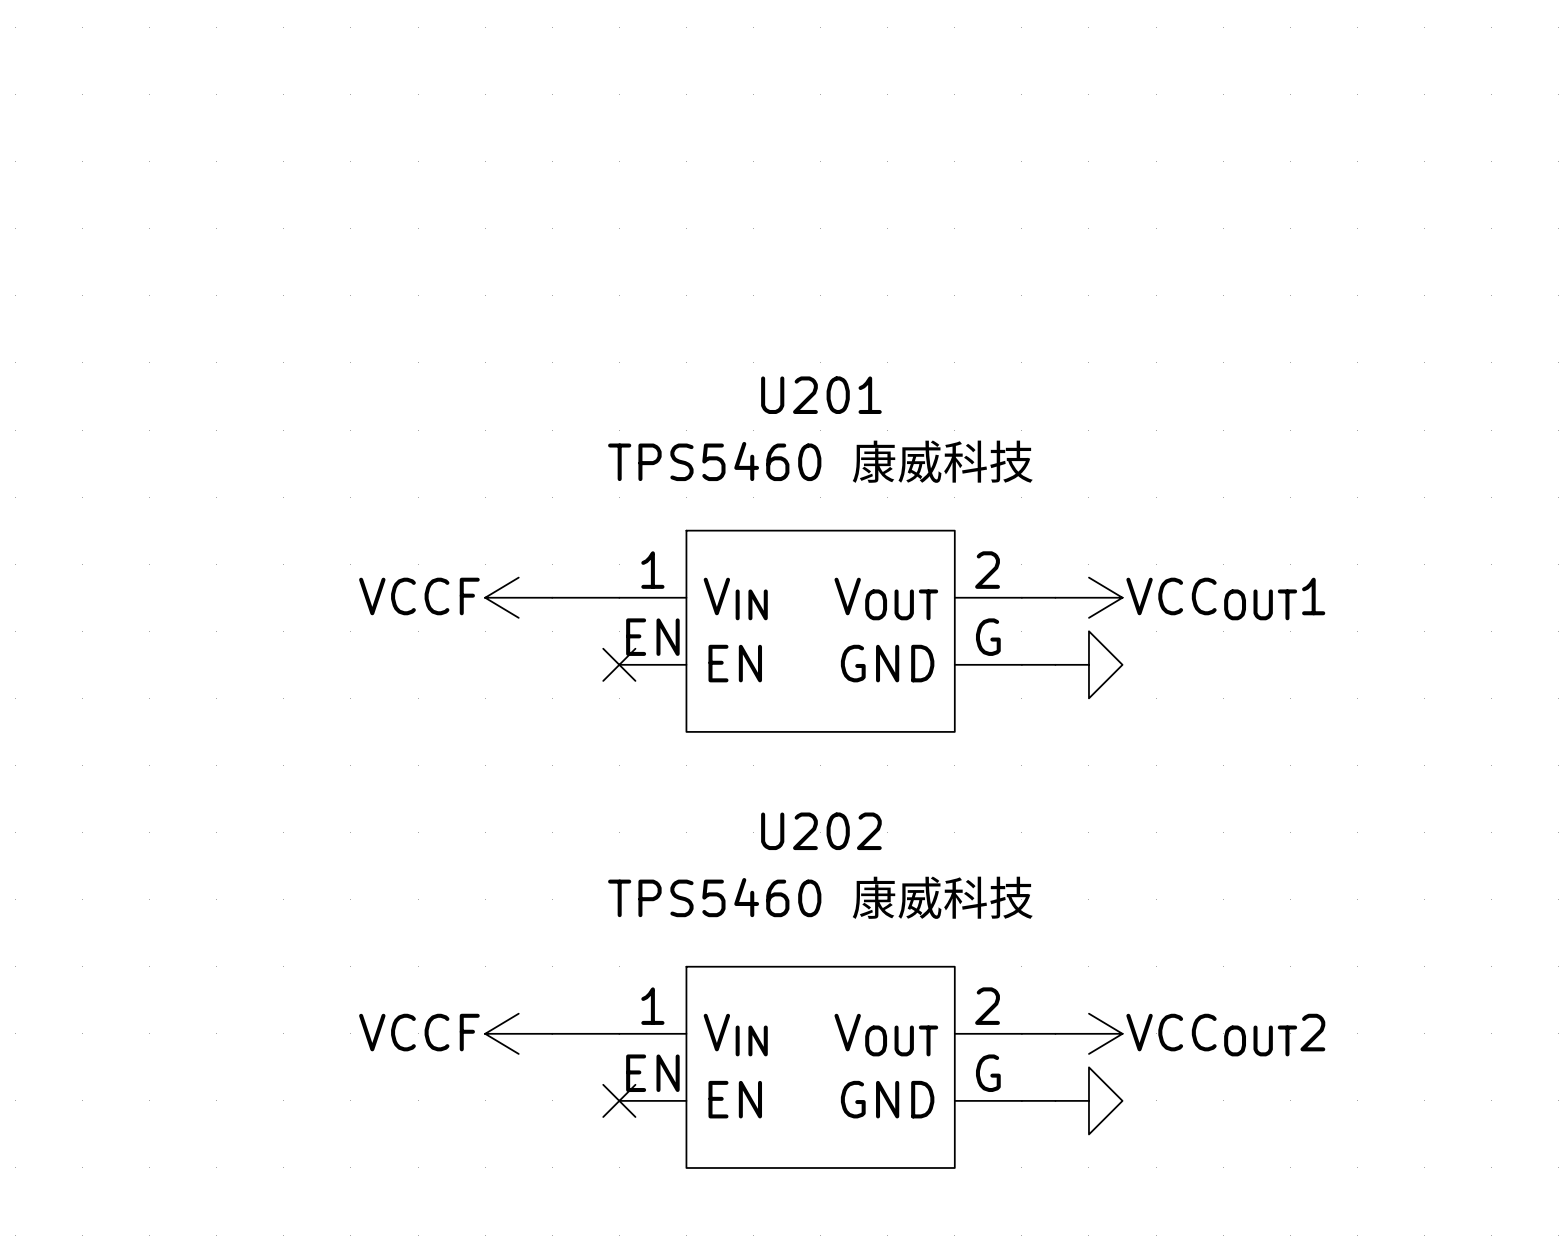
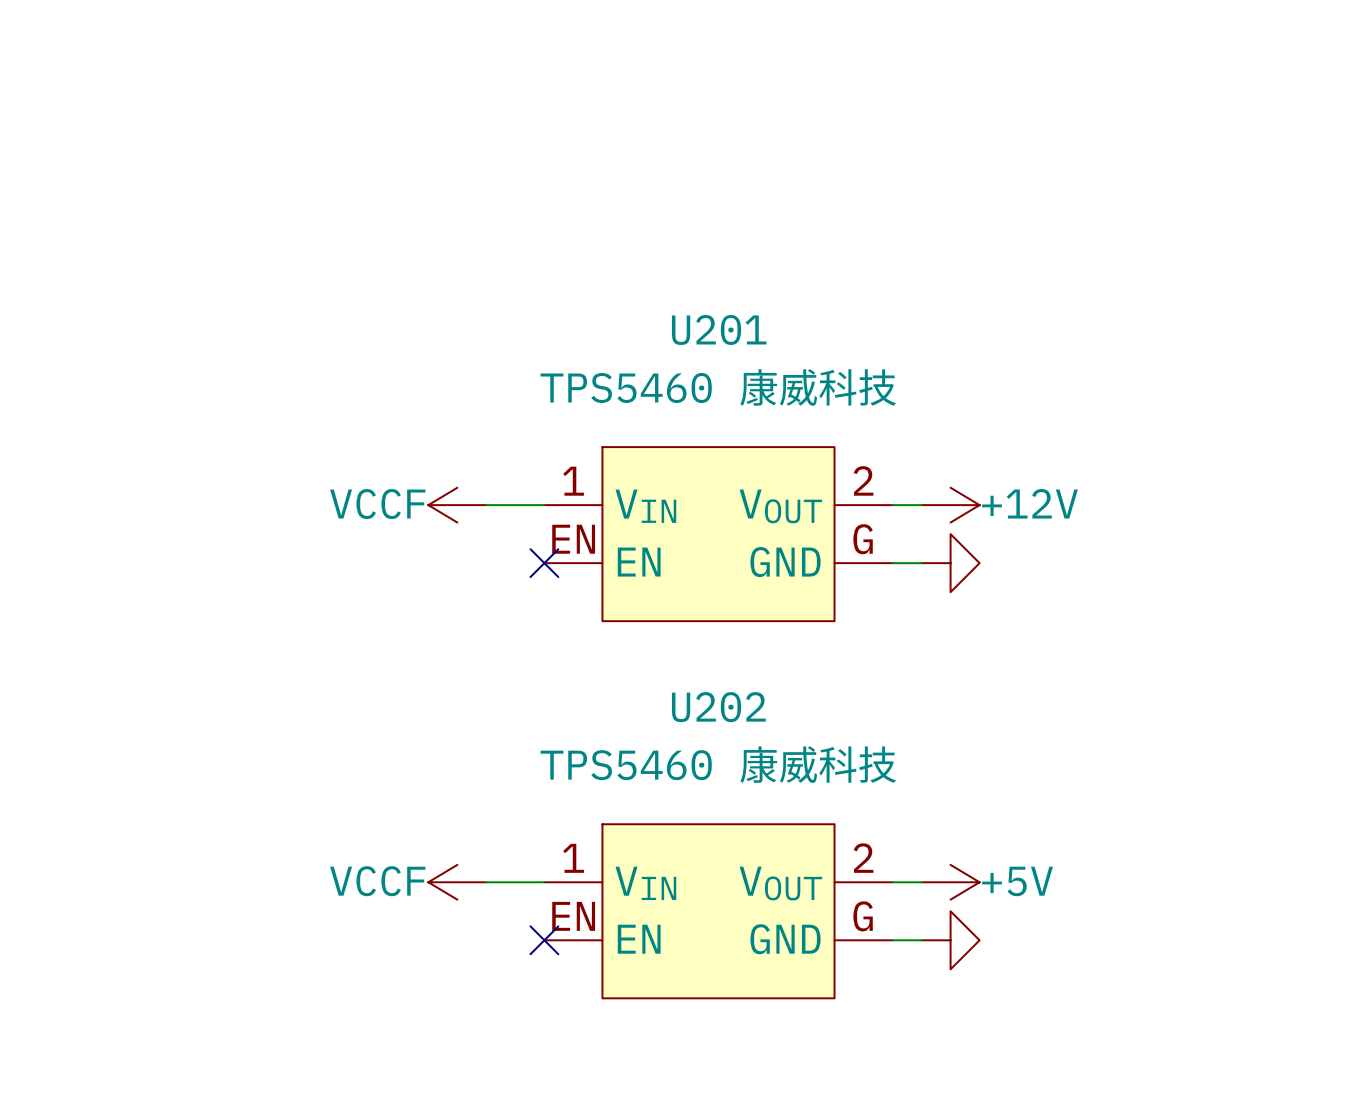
power symbol: VCCOUT1 (1088, 597) -> +12V (950, 505)
power symbol: VCCOUT2 (1088, 1033) -> +5V (950, 882)

